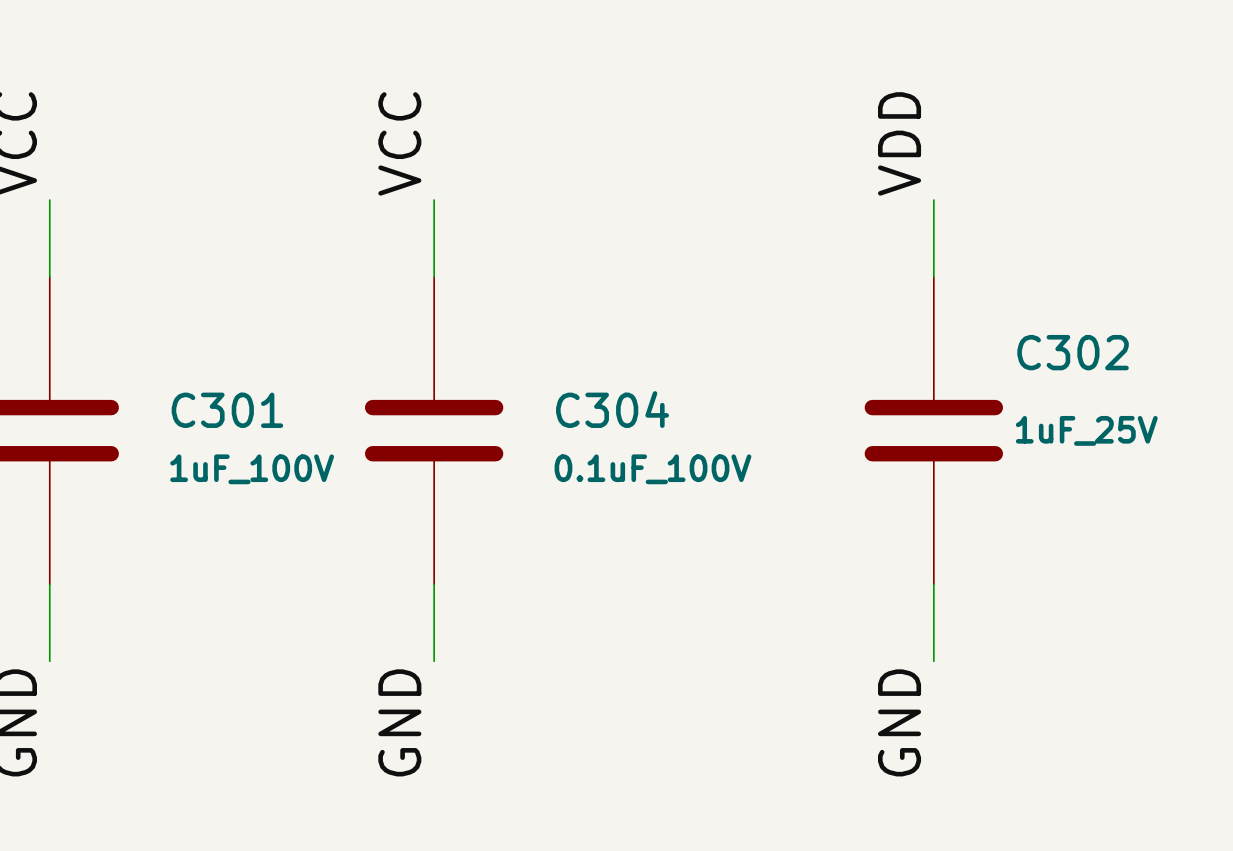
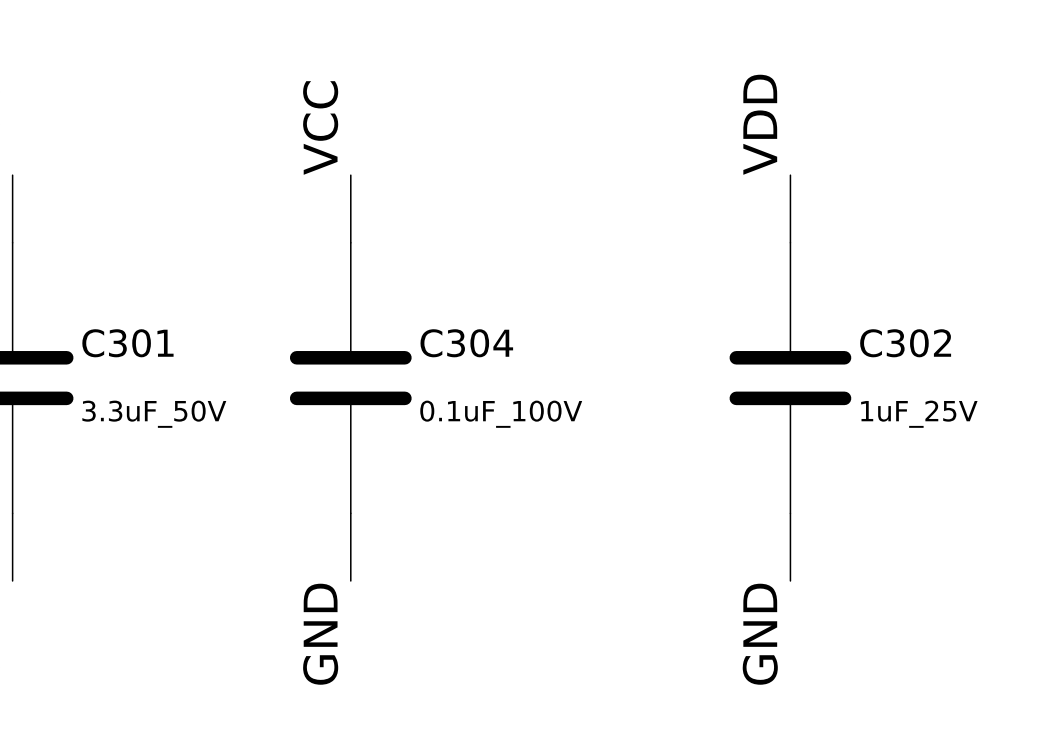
C302 name position: C302 (1073, 352) -> C302 (905, 343)
C304 name position: C304 (612, 409) -> C304 (466, 343)
C301 name position: C301 (227, 410) -> C301 (127, 343)
C302 value position: 1uF_25V (1086, 430) -> 1uF_25V (919, 414)
C301 value: 1uF_100V (252, 469) -> 3.3uF_50V (154, 414)
C304 value position: 0.1uF_100V (652, 469) -> 0.1uF_100V (501, 414)

